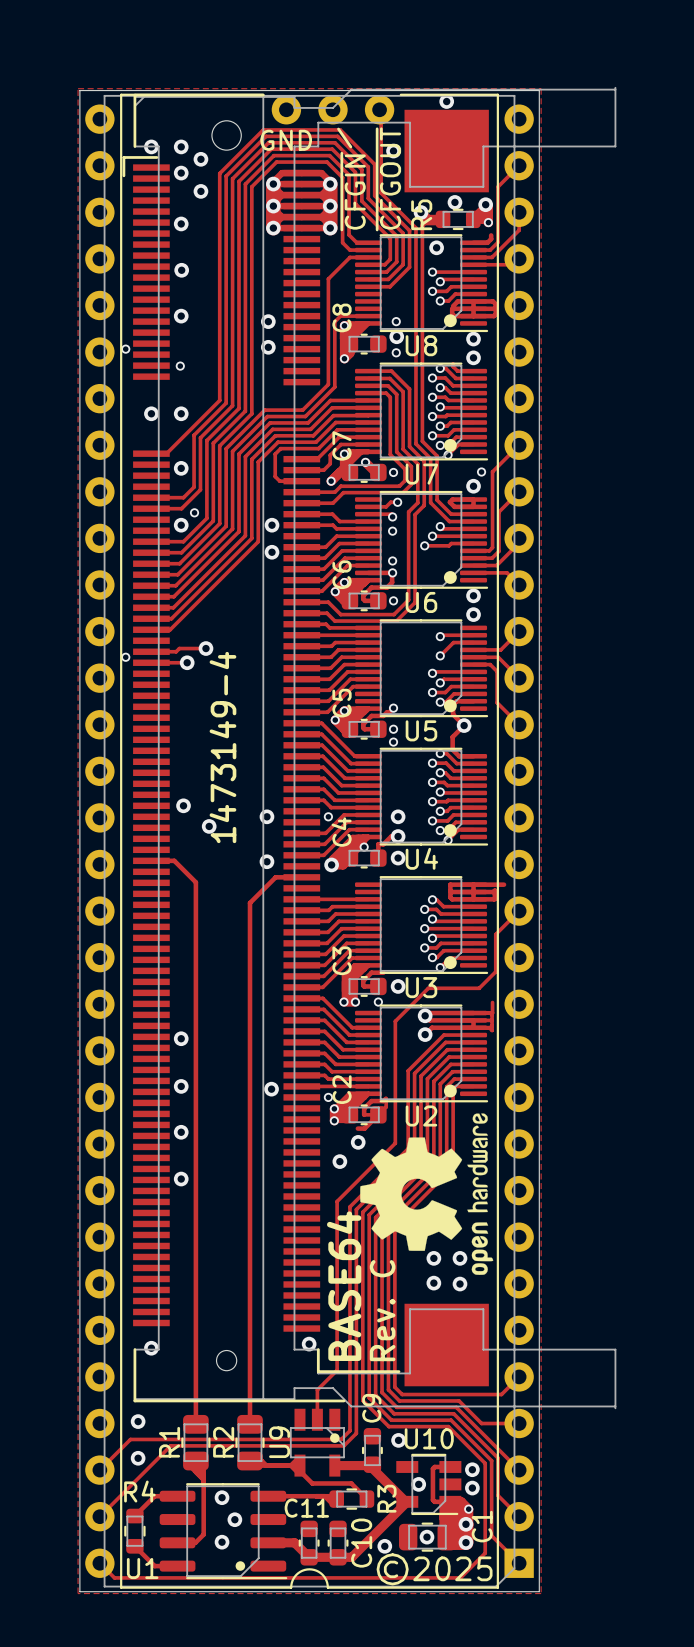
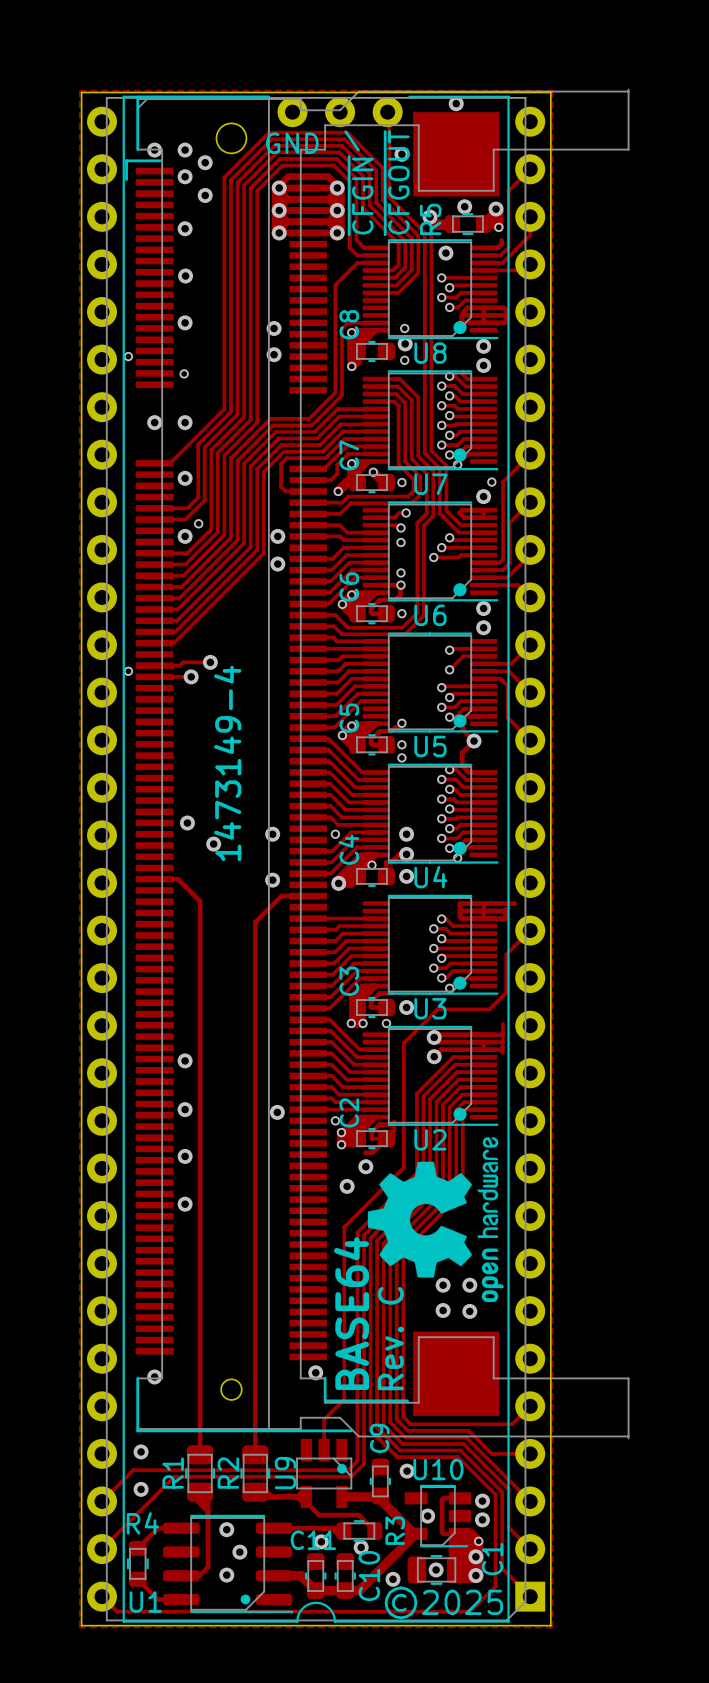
via: none -> (321, 1541)
via: none -> (361, 1547)

